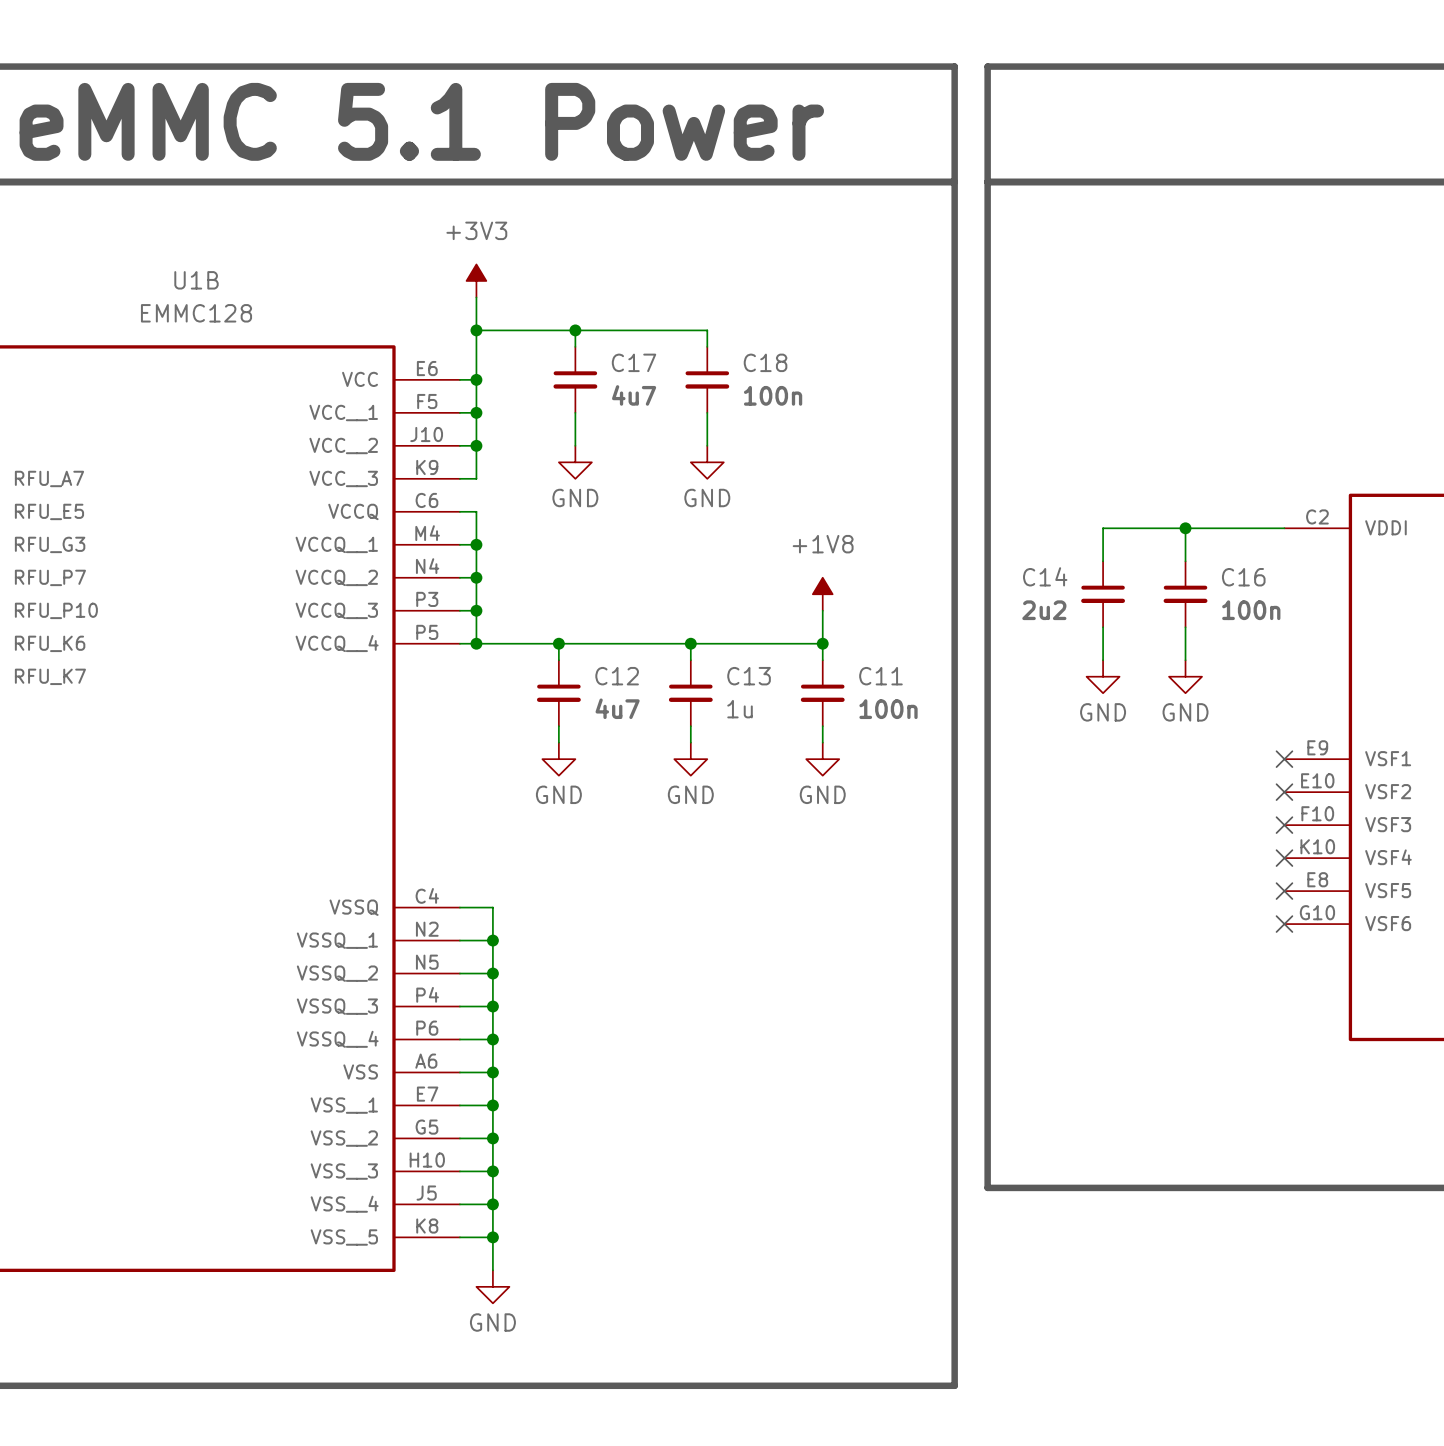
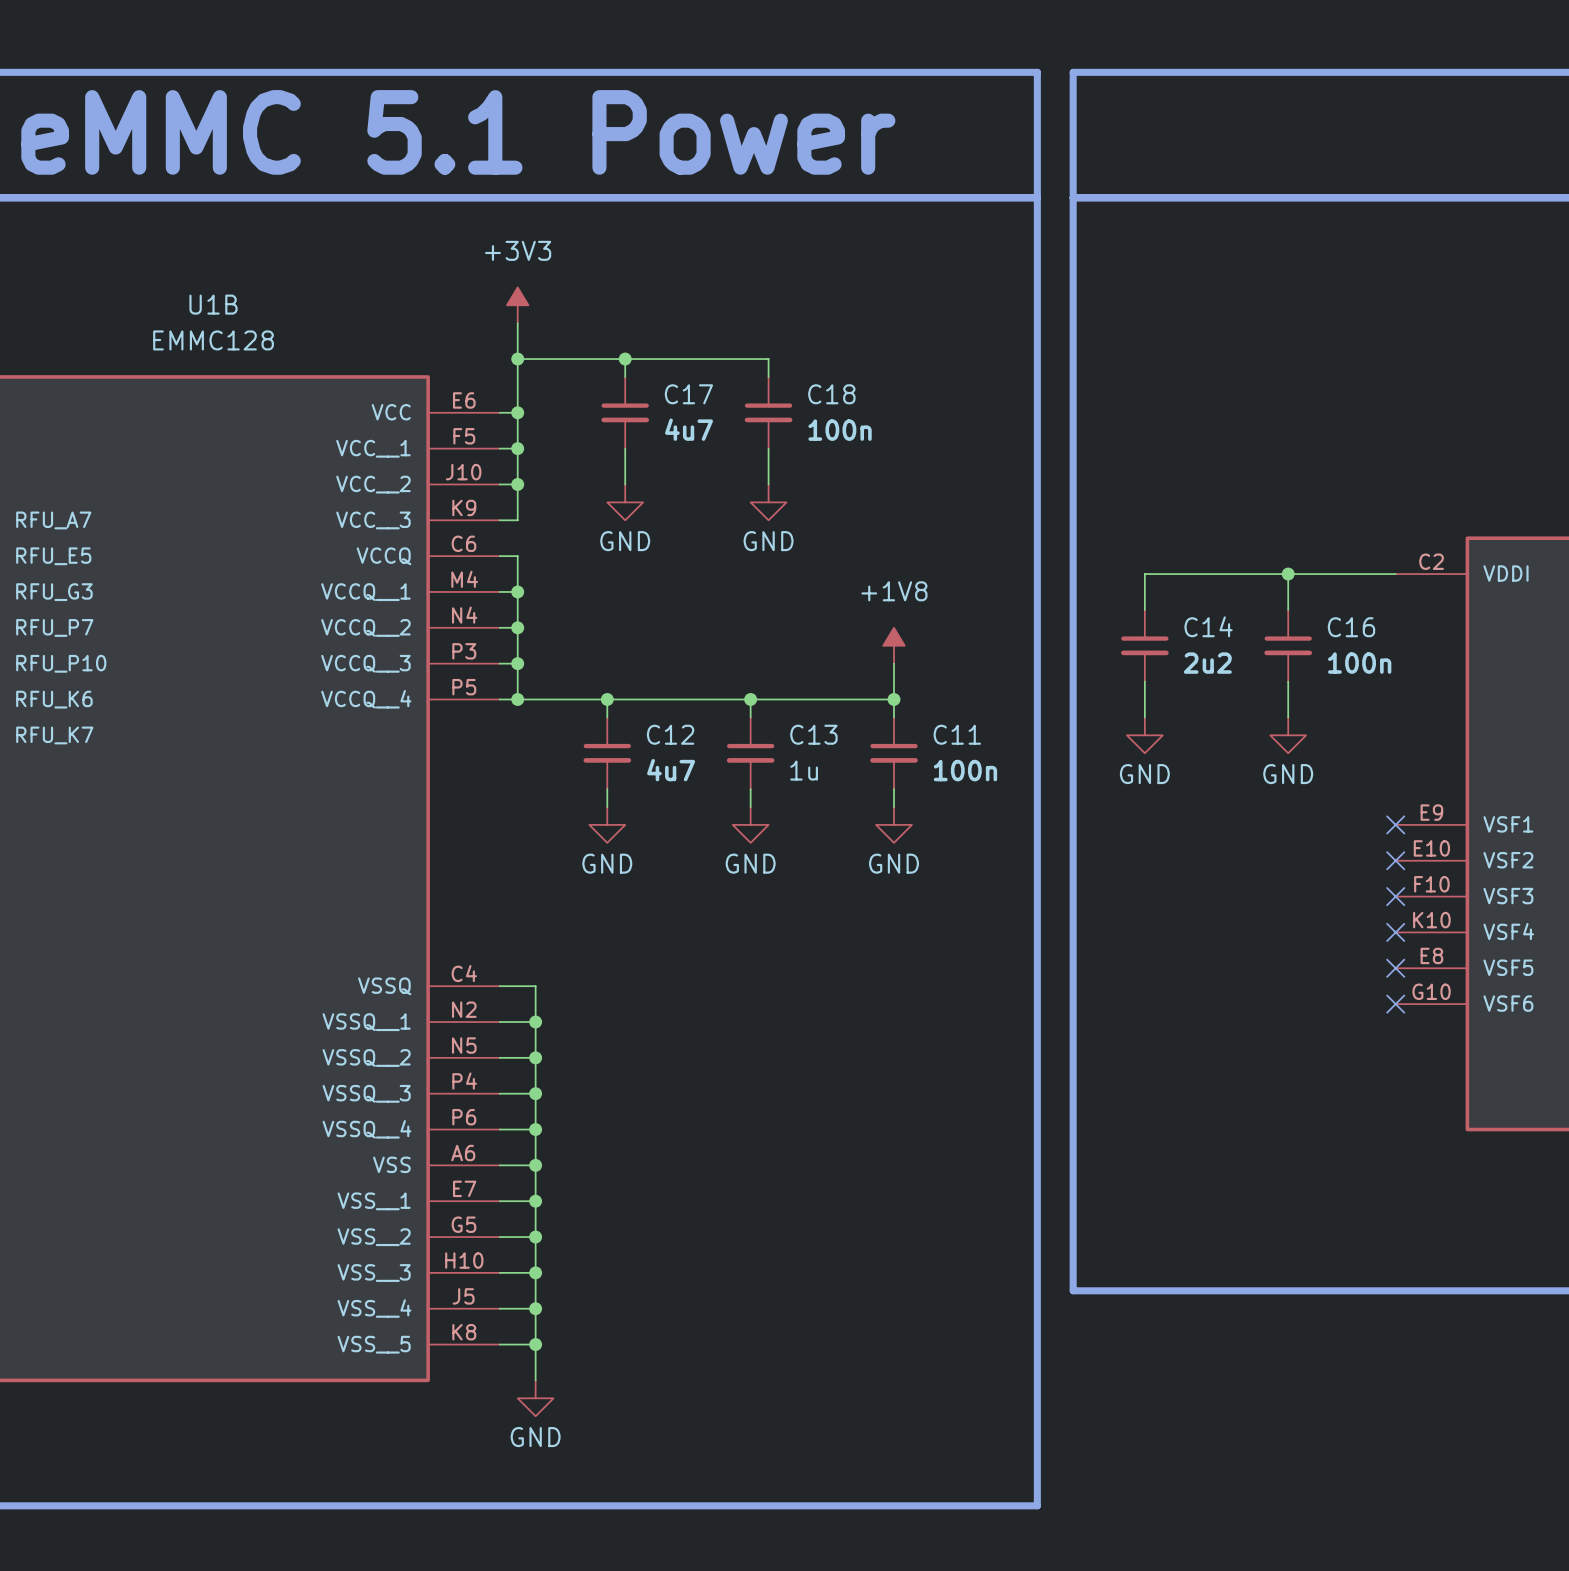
wire: (1103, 528) (1103, 561) -> (1198, 574) (1144, 574) (1144, 609)
C14 name position: C14 (1045, 576) -> C14 (1208, 626)
C14 position: (1103, 594) -> (1144, 645)
C14 value position: 2u2 (1044, 610) -> 2u2 (1207, 663)
wire: (1103, 627) (1103, 660) -> (1144, 681) (1144, 717)
power symbol position: GND (1103, 676) -> GND (1144, 735)

